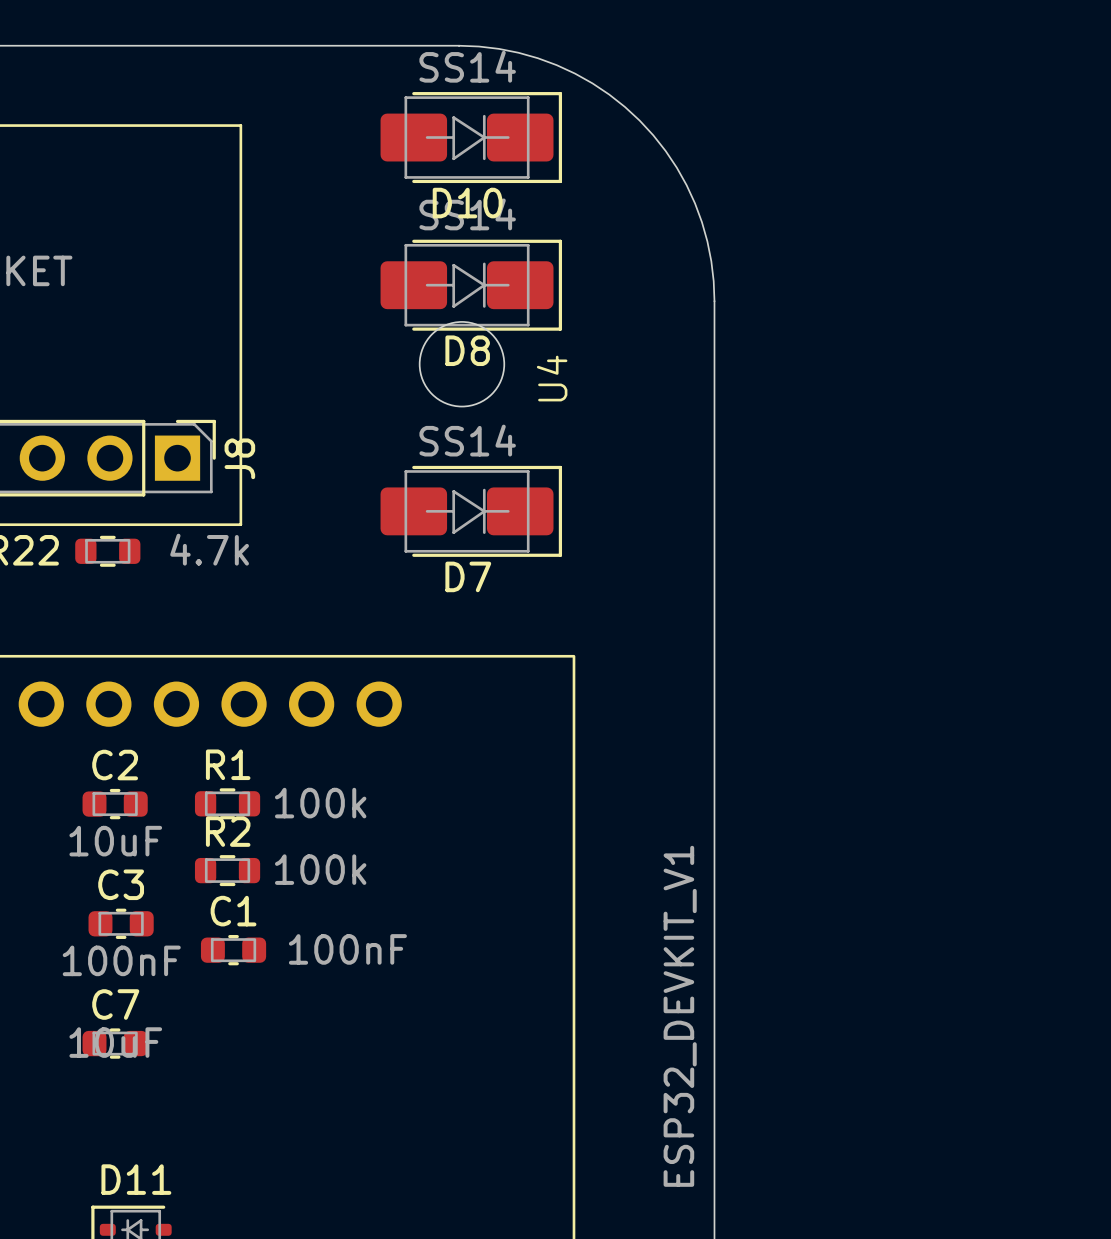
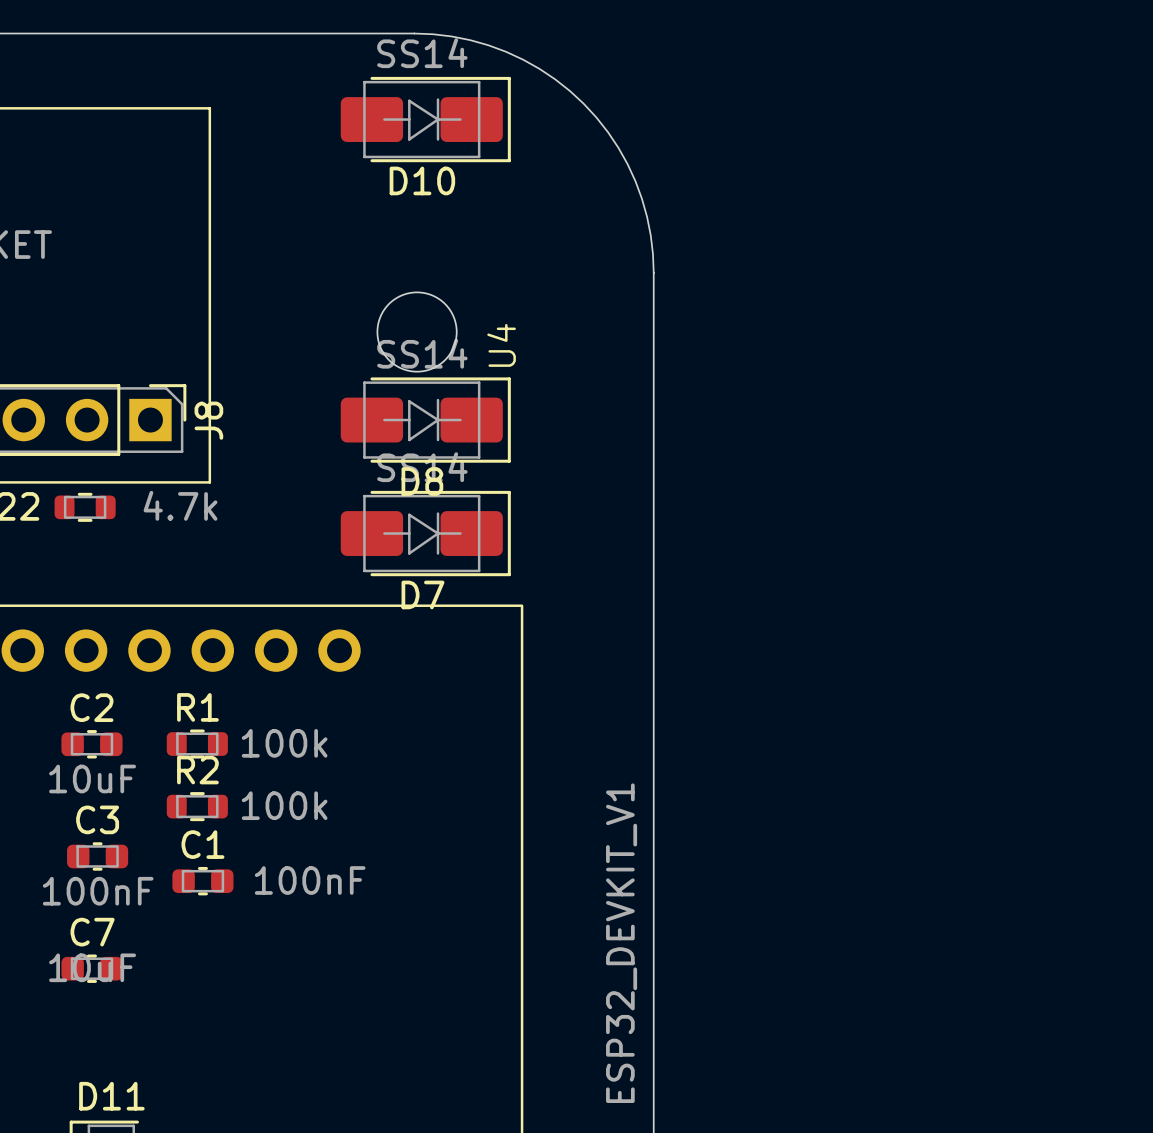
D8 position: (471, 285) -> (425, 420)
D7 position: (471, 511) -> (425, 533)

